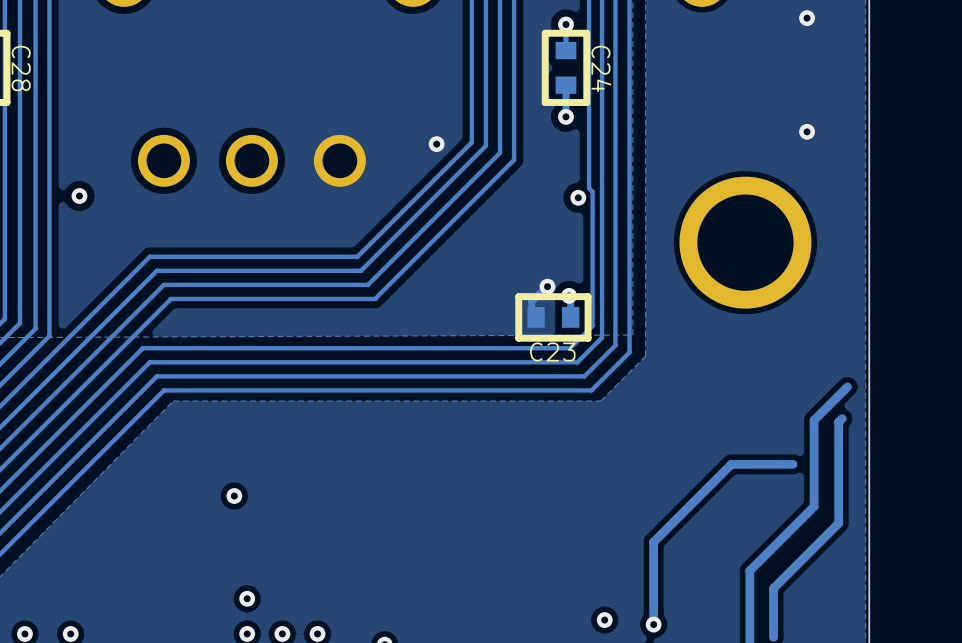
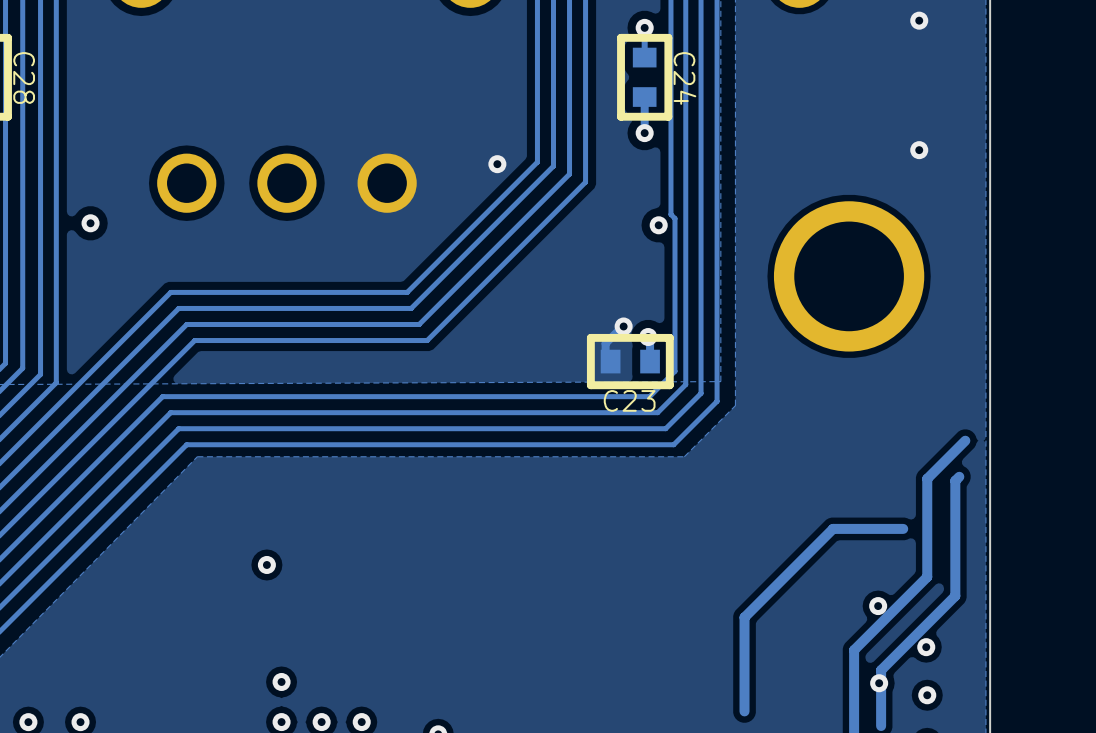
via: none -> (878, 606)
via: none -> (926, 647)
via: none -> (879, 683)
via: none -> (927, 695)
via: (604, 620) -> none
via: (653, 624) -> none

